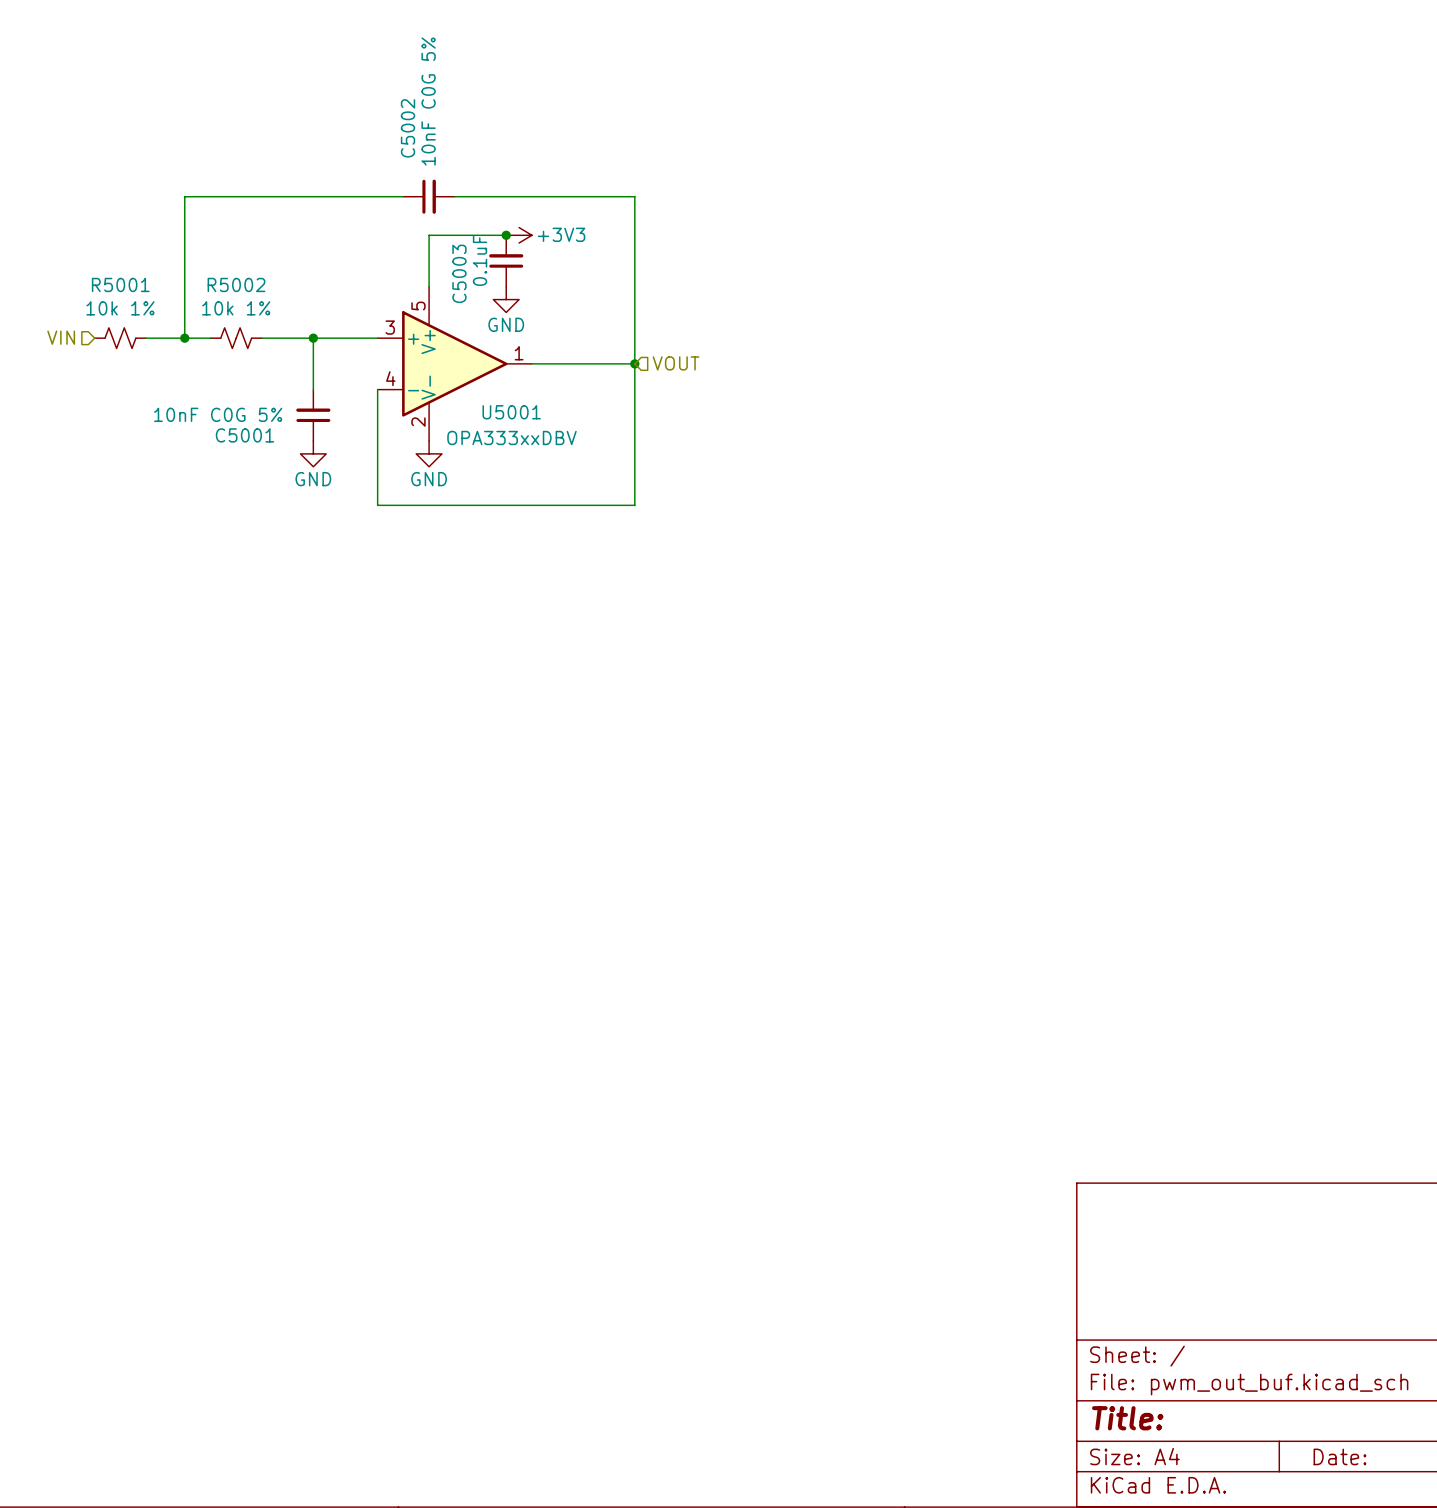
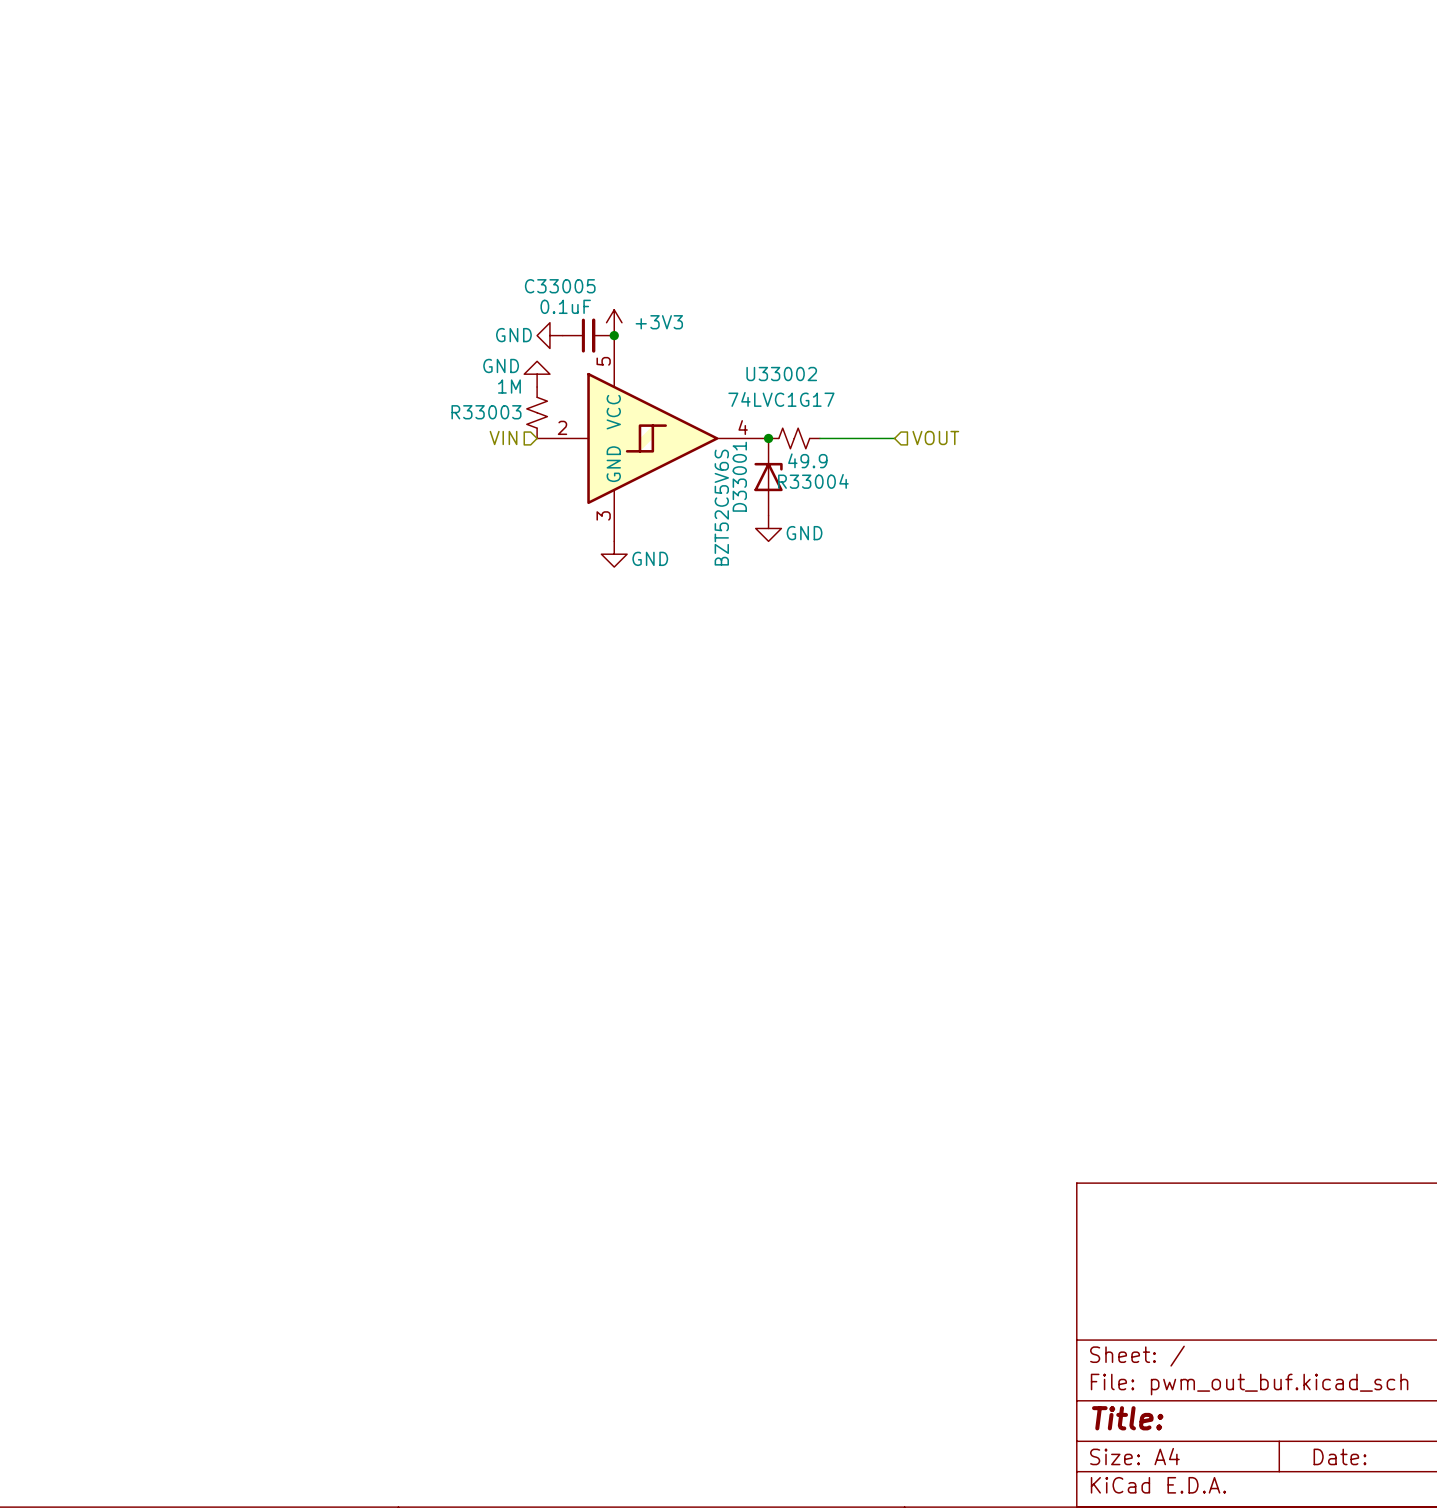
wire: (403, 196) (184, 196) (184, 338) -> none
C5002: 10nF C0G 5% (429, 196) -> none
wire: (454, 196) (634, 196) (634, 505) (377, 505) (377, 389) -> none
wire: (506, 235) (429, 235) (429, 286) -> none
junction: (506, 235) -> none
power symbol rotation: 0° (519, 235) -> 90° counterclockwise (614, 322)
power symbol position: +3V3 (519, 235) -> +3V3 (614, 322)
C5003: 0.1uF (506, 261) -> none
power symbol: GND (506, 299) -> none
power symbol: none -> GND (549, 335)
C33005: none -> 0.1uF (588, 335)
hierarchical label: VIN (61, 337) -> none
R5001: 10k 1% (120, 338) -> none
wire: (146, 338) (210, 338) -> none
junction: (184, 338) -> none
R5002: 10k 1% (236, 338) -> none
wire: (261, 338) (377, 338) -> none
wire: (313, 338) (313, 389) -> none
junction: (313, 338) -> none
U5001: OPA333xxDBV (454, 363) -> none
wire: (531, 363) (634, 363) -> none
junction position: (634, 363) -> (614, 335)
hierarchical label: VOUT (676, 363) -> none
power symbol: none -> GND (537, 374)
R33003: none -> 1M (537, 412)
C5001: 10nF C0G 5% (313, 415) -> none
hierarchical label: none -> VIN (503, 437)
hierarchical label: none -> VOUT (935, 437)
U33002: none -> 74LVC1G17 (652, 438)
junction: none -> (768, 438)
R33004: none -> 49.9 (794, 438)
wire: none -> (819, 438) (894, 438)
power symbol: GND (313, 453) -> none
power symbol: GND (429, 453) -> none
D33001: none -> BZT52C5V6S (768, 477)
power symbol: none -> GND (768, 528)
power symbol: none -> GND (614, 554)

